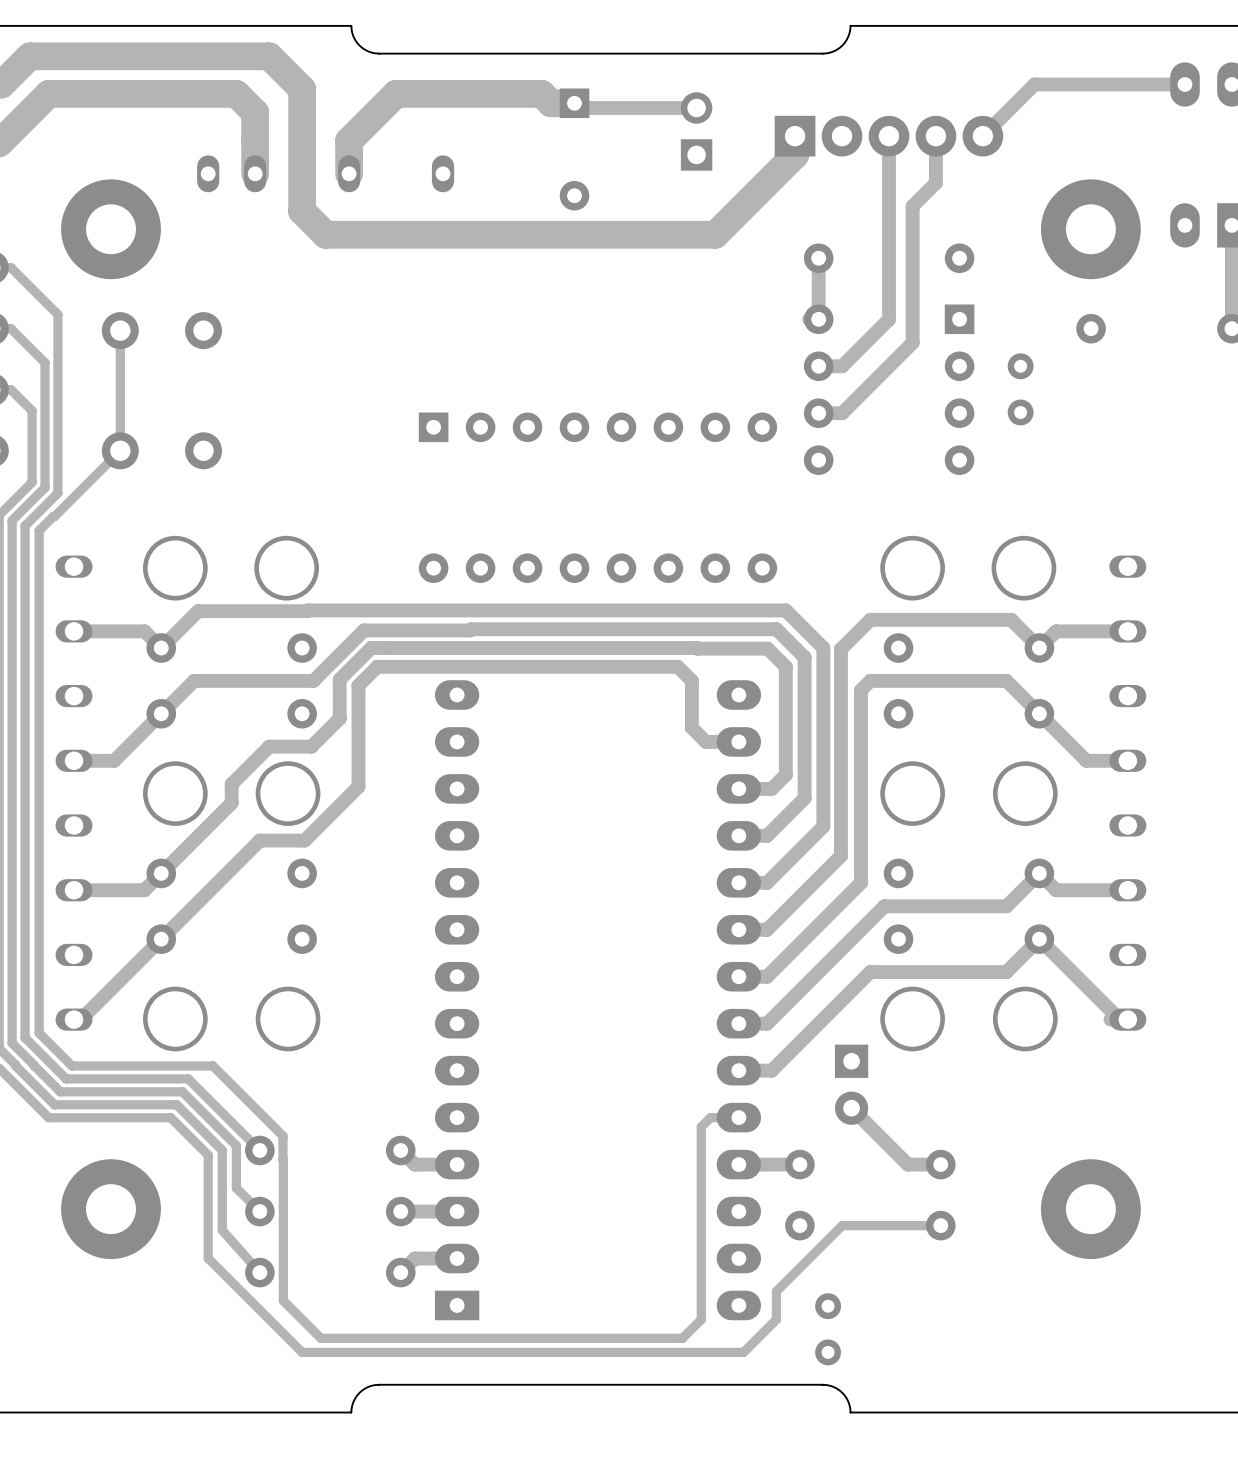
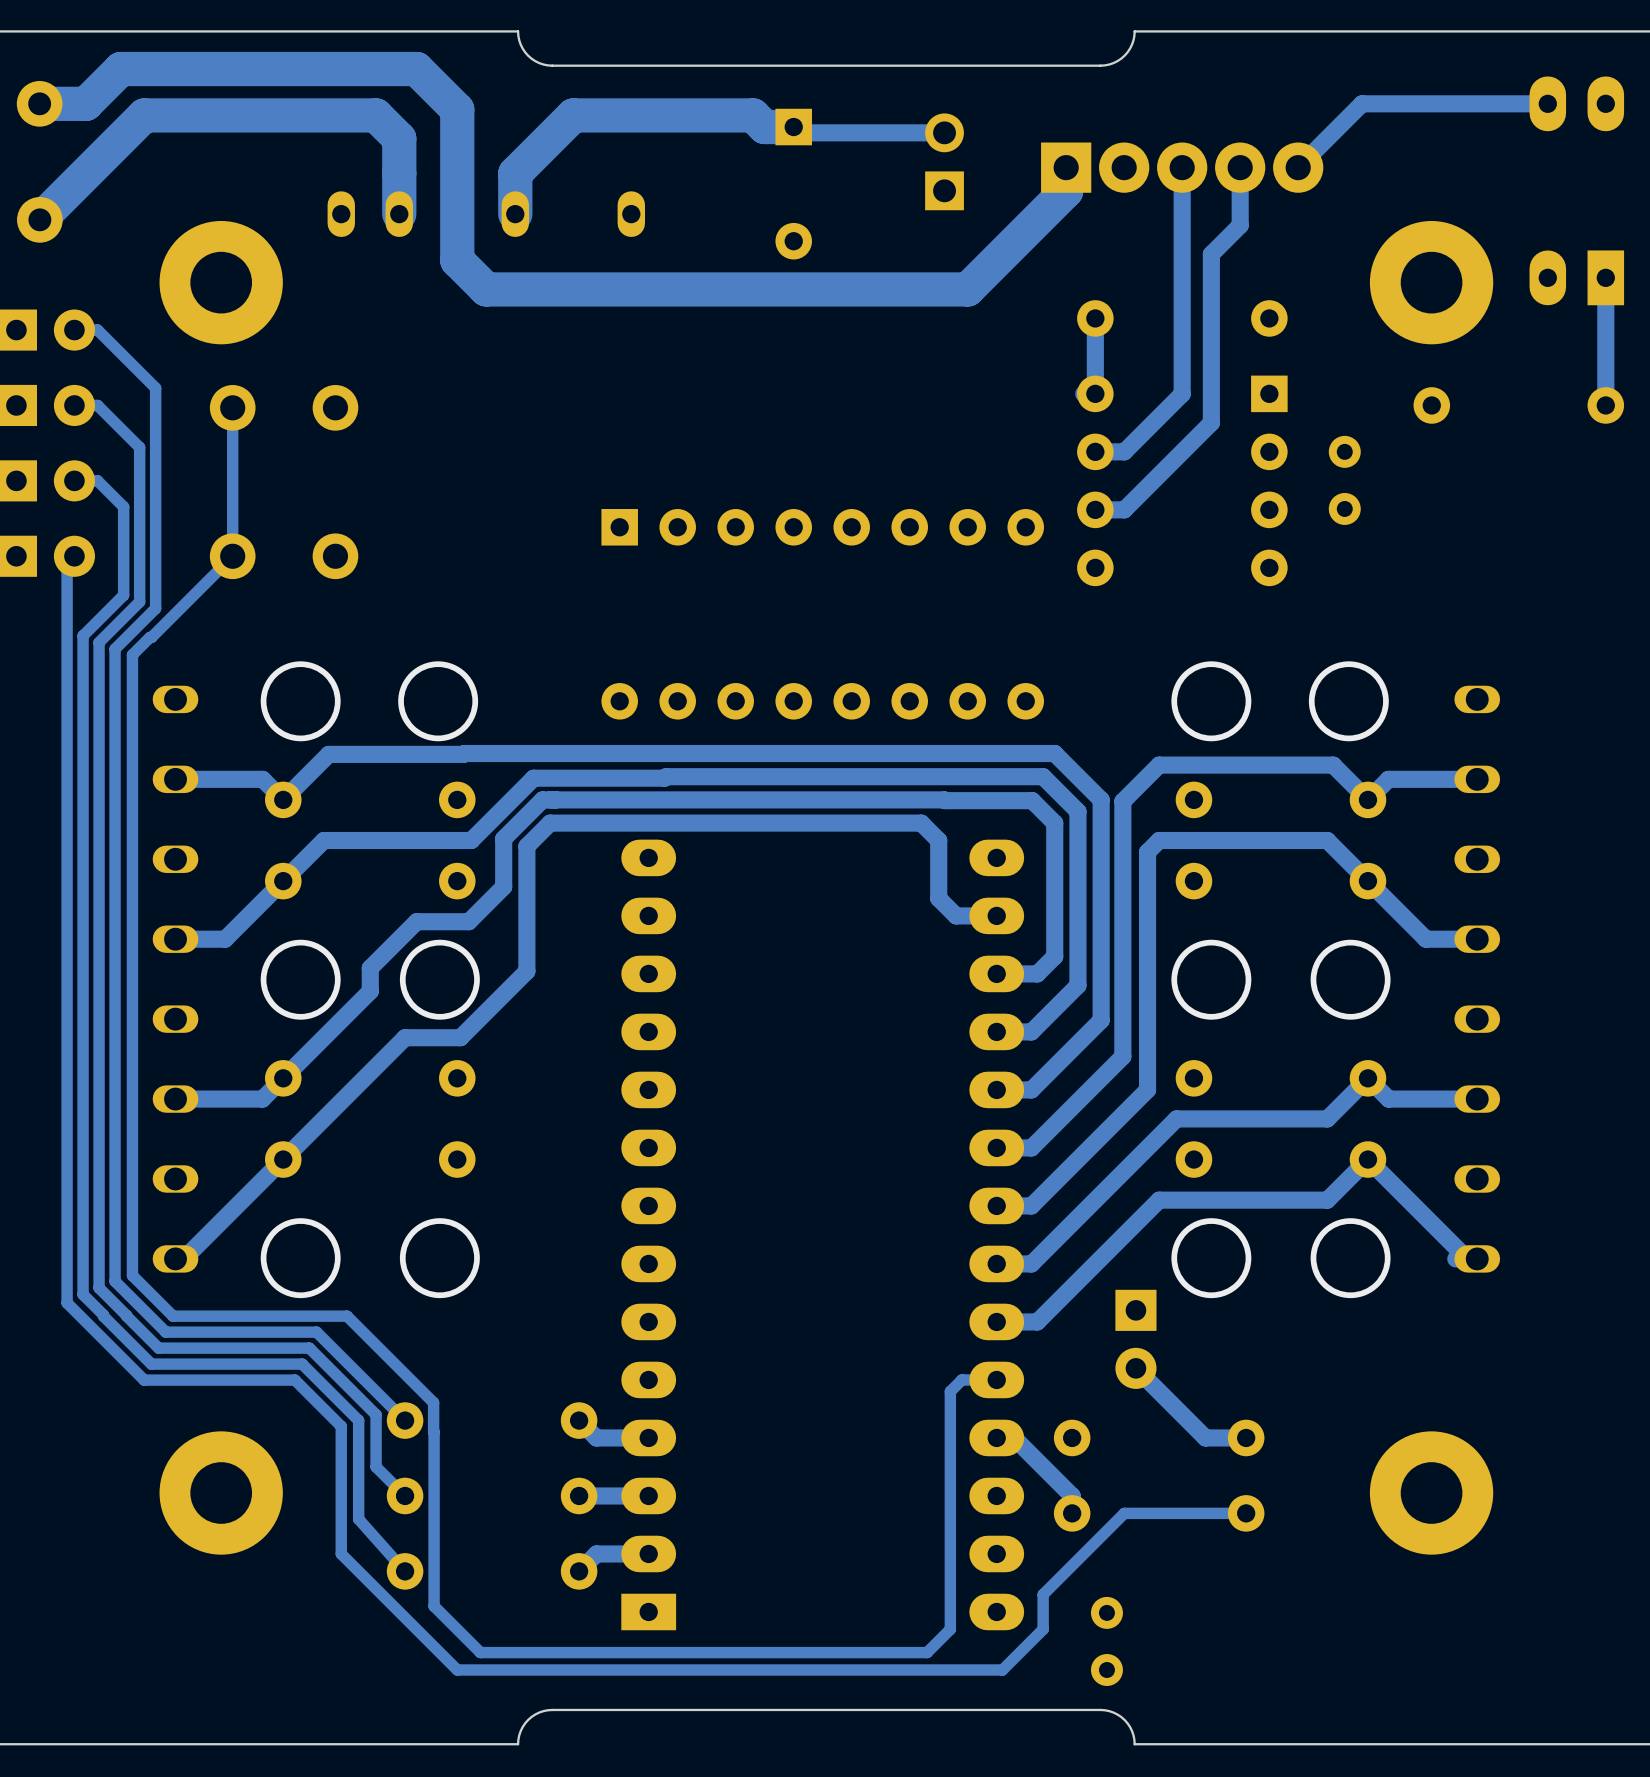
track: (799, 1164) (752, 1164) -> (1072, 1513) (1072, 1495) (1014, 1437)

